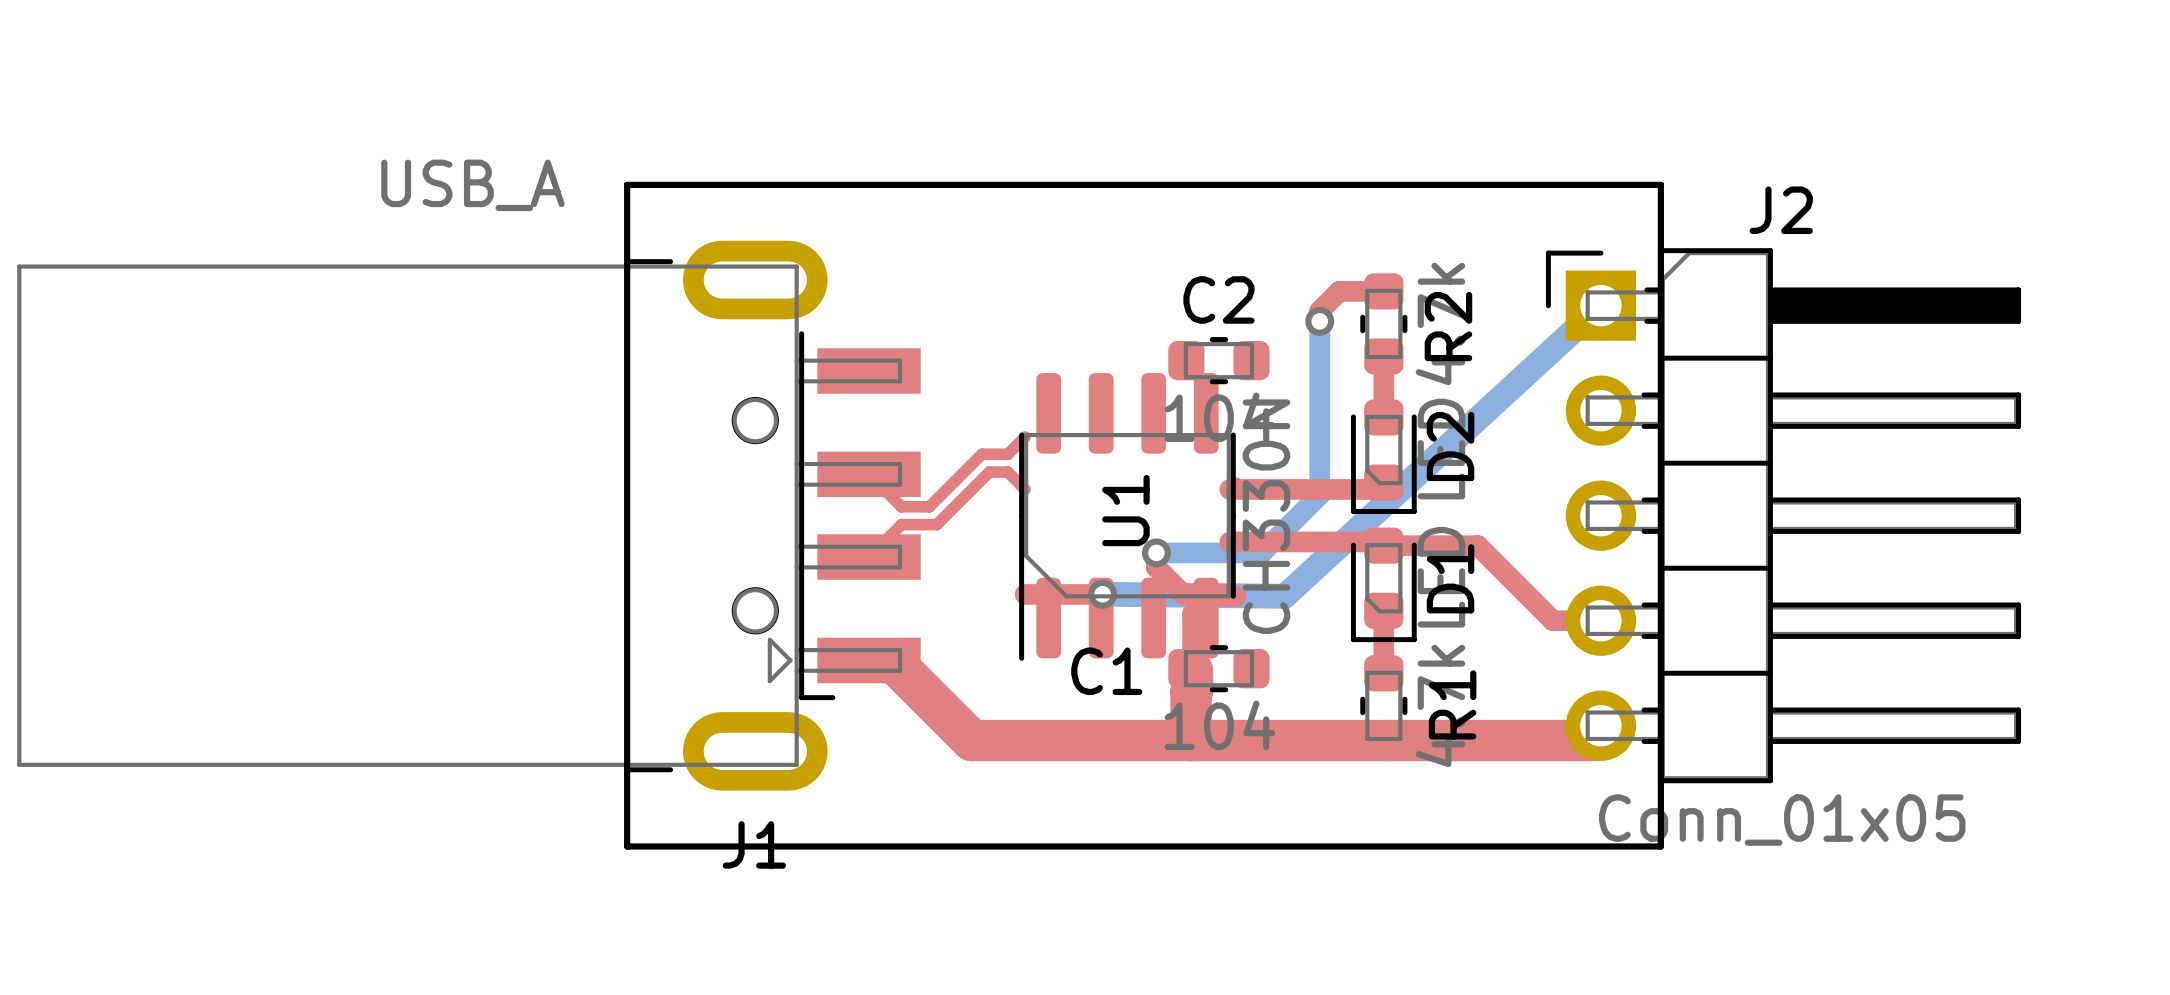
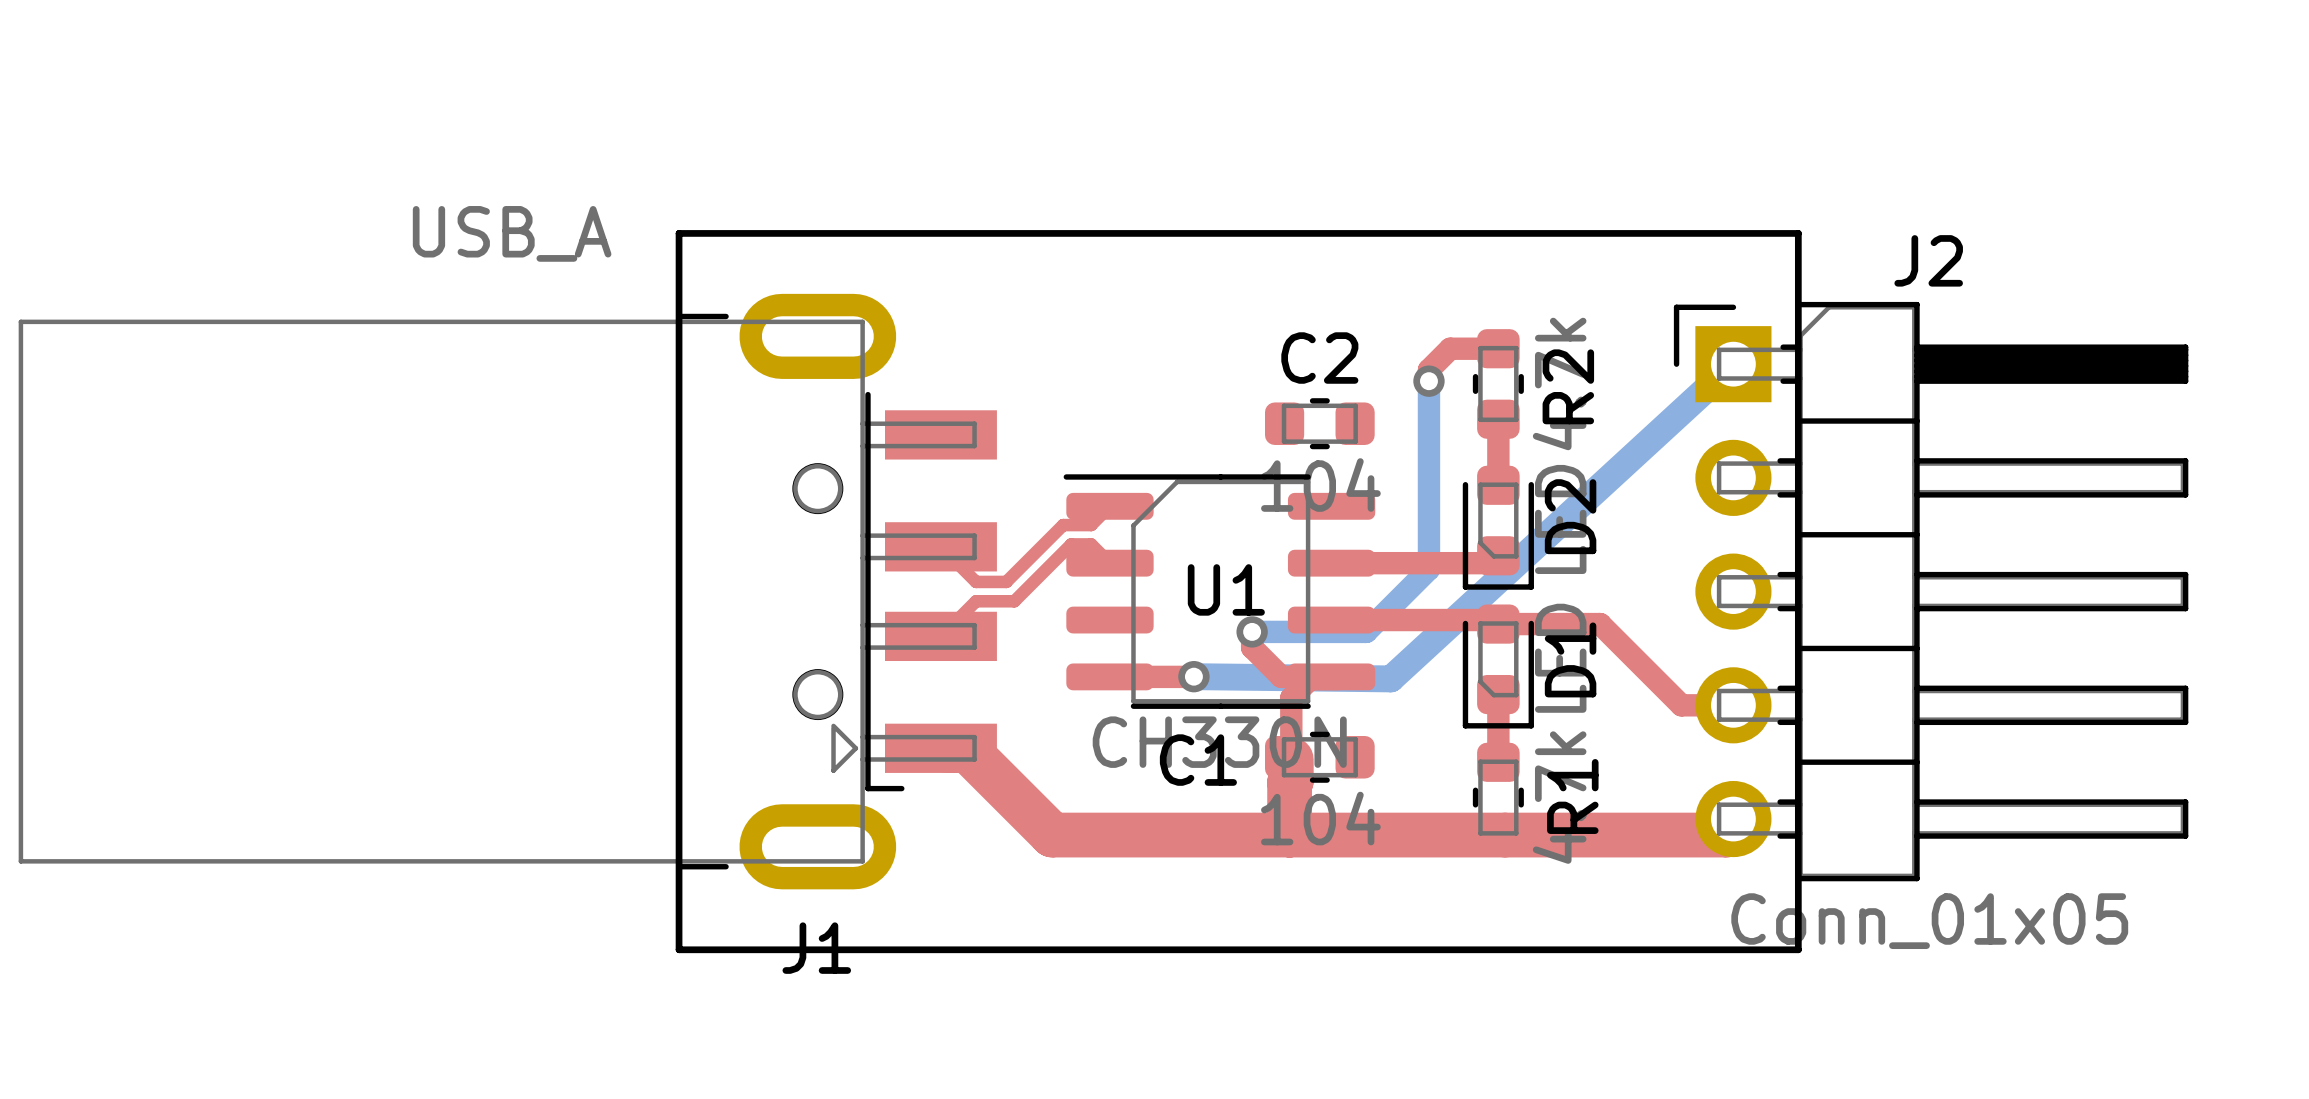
U1 rotation: 0° (1127, 516) -> 90° clockwise (1219, 591)

